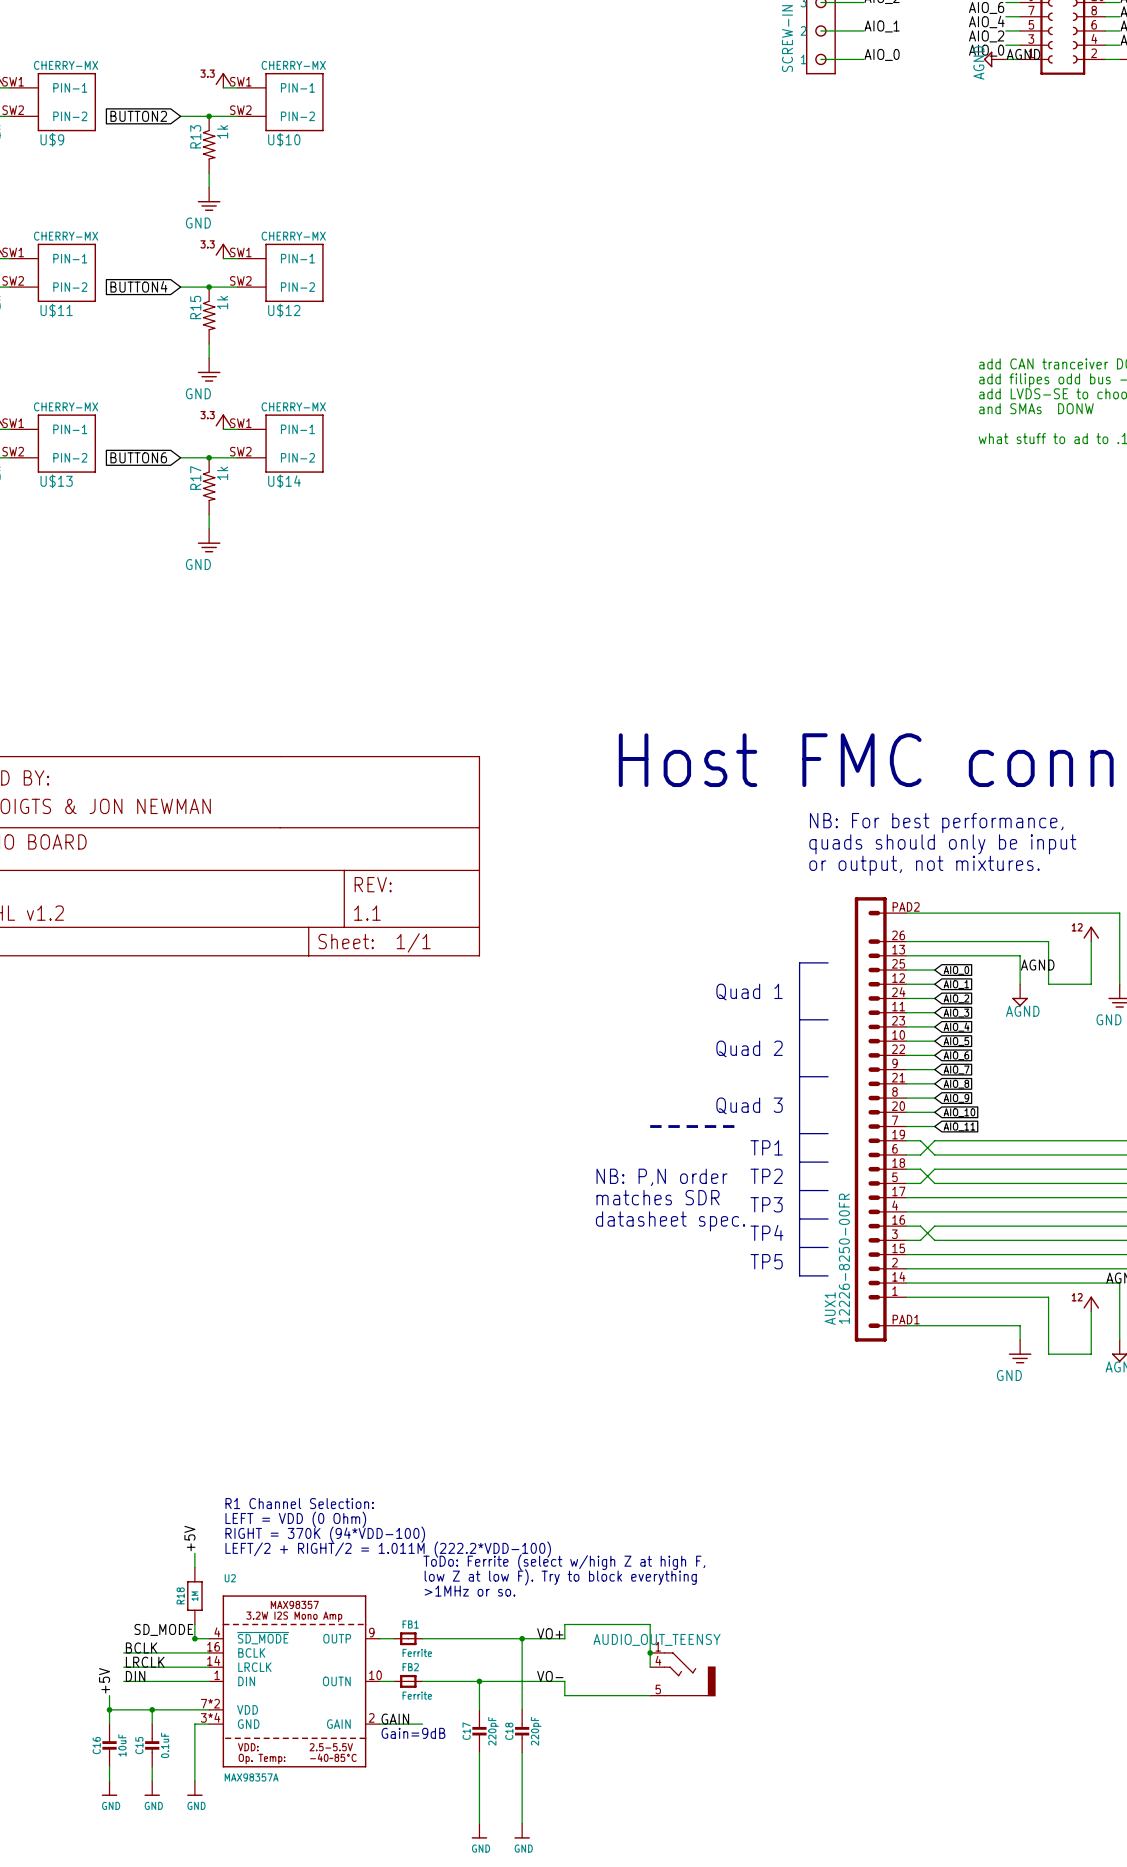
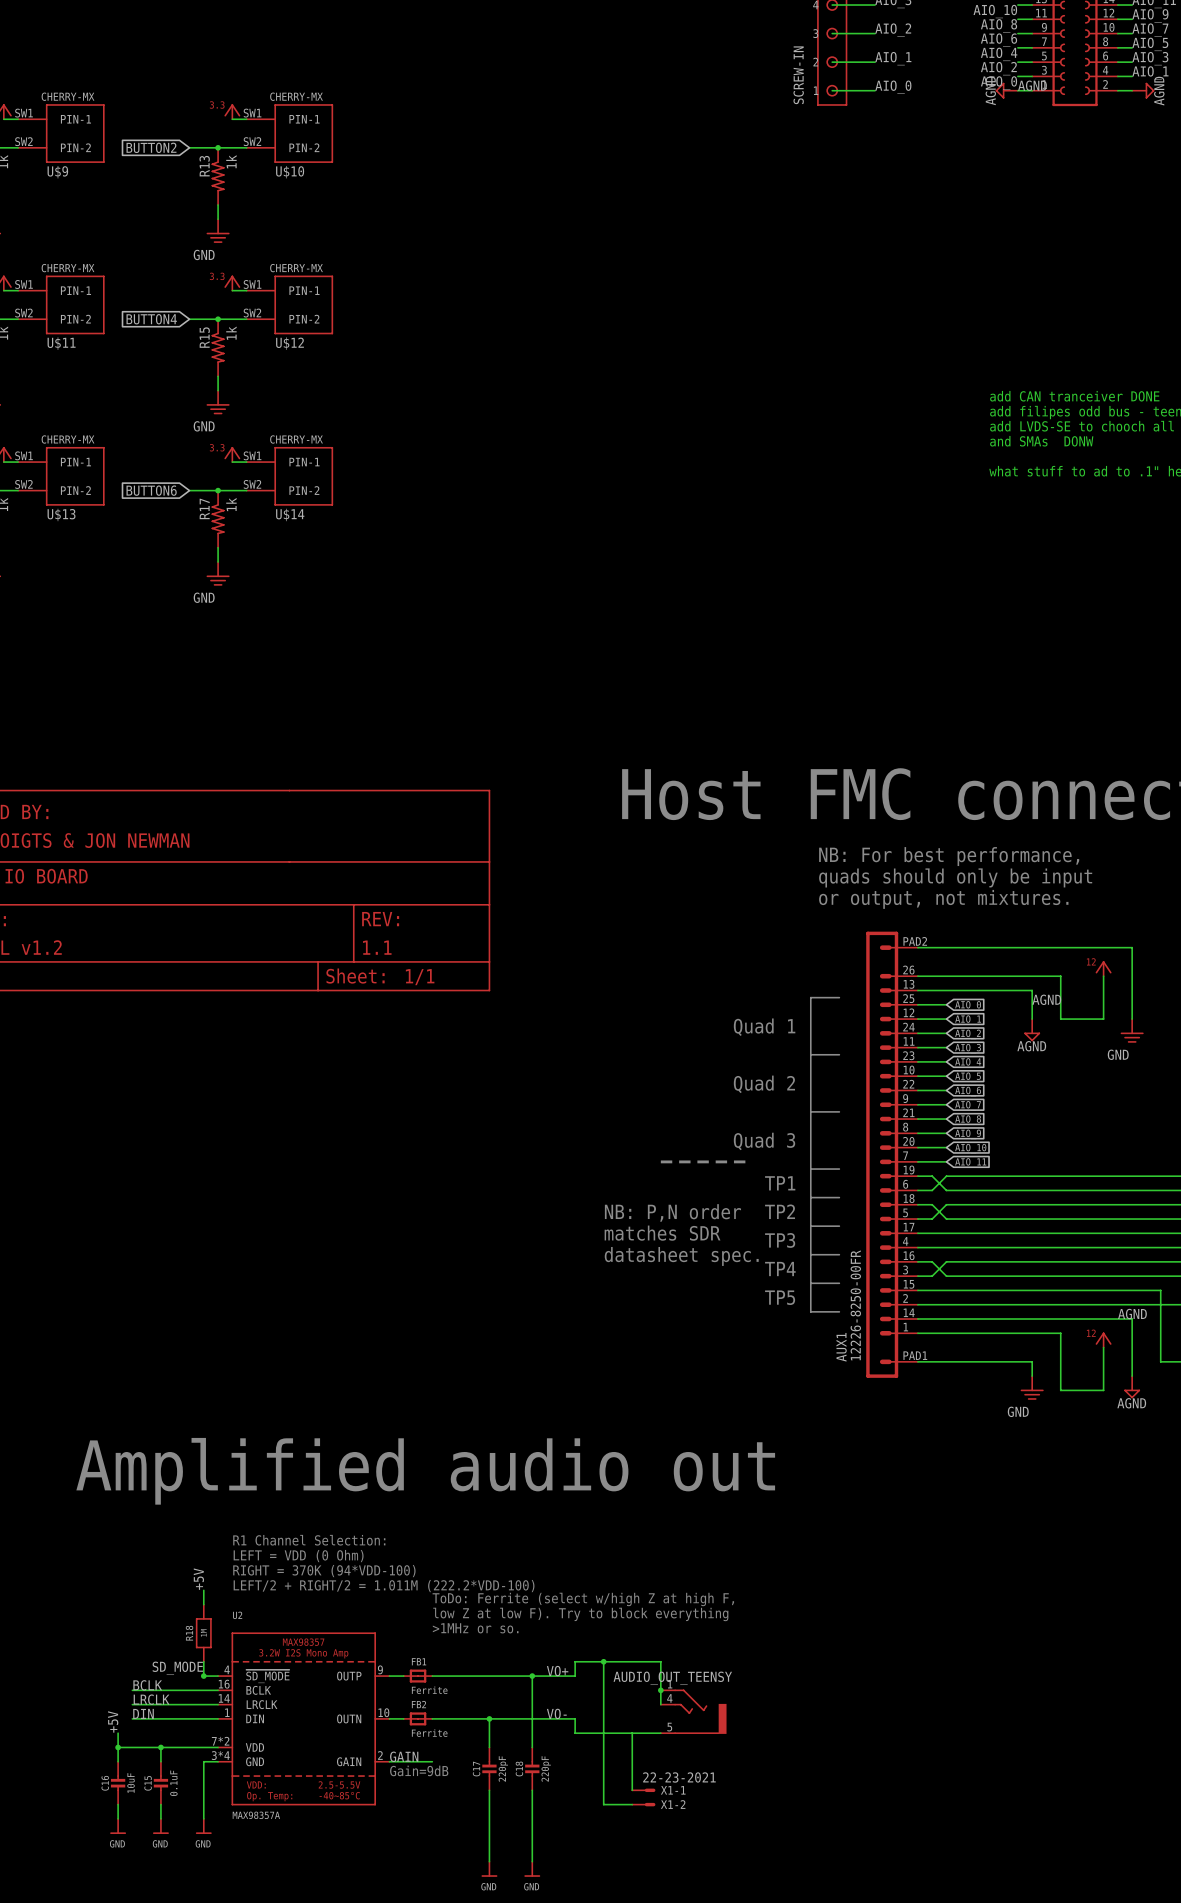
text: none -> Amplified audio out (425, 1471)
wire: none -> (603, 1661) (603, 1804) (632, 1804)
junction: none -> (603, 1661)
wire: none -> (632, 1733) (632, 1790)
X1-1: none -> 22-23-2021 (643, 1790)
X1-2: none -> (643, 1804)

